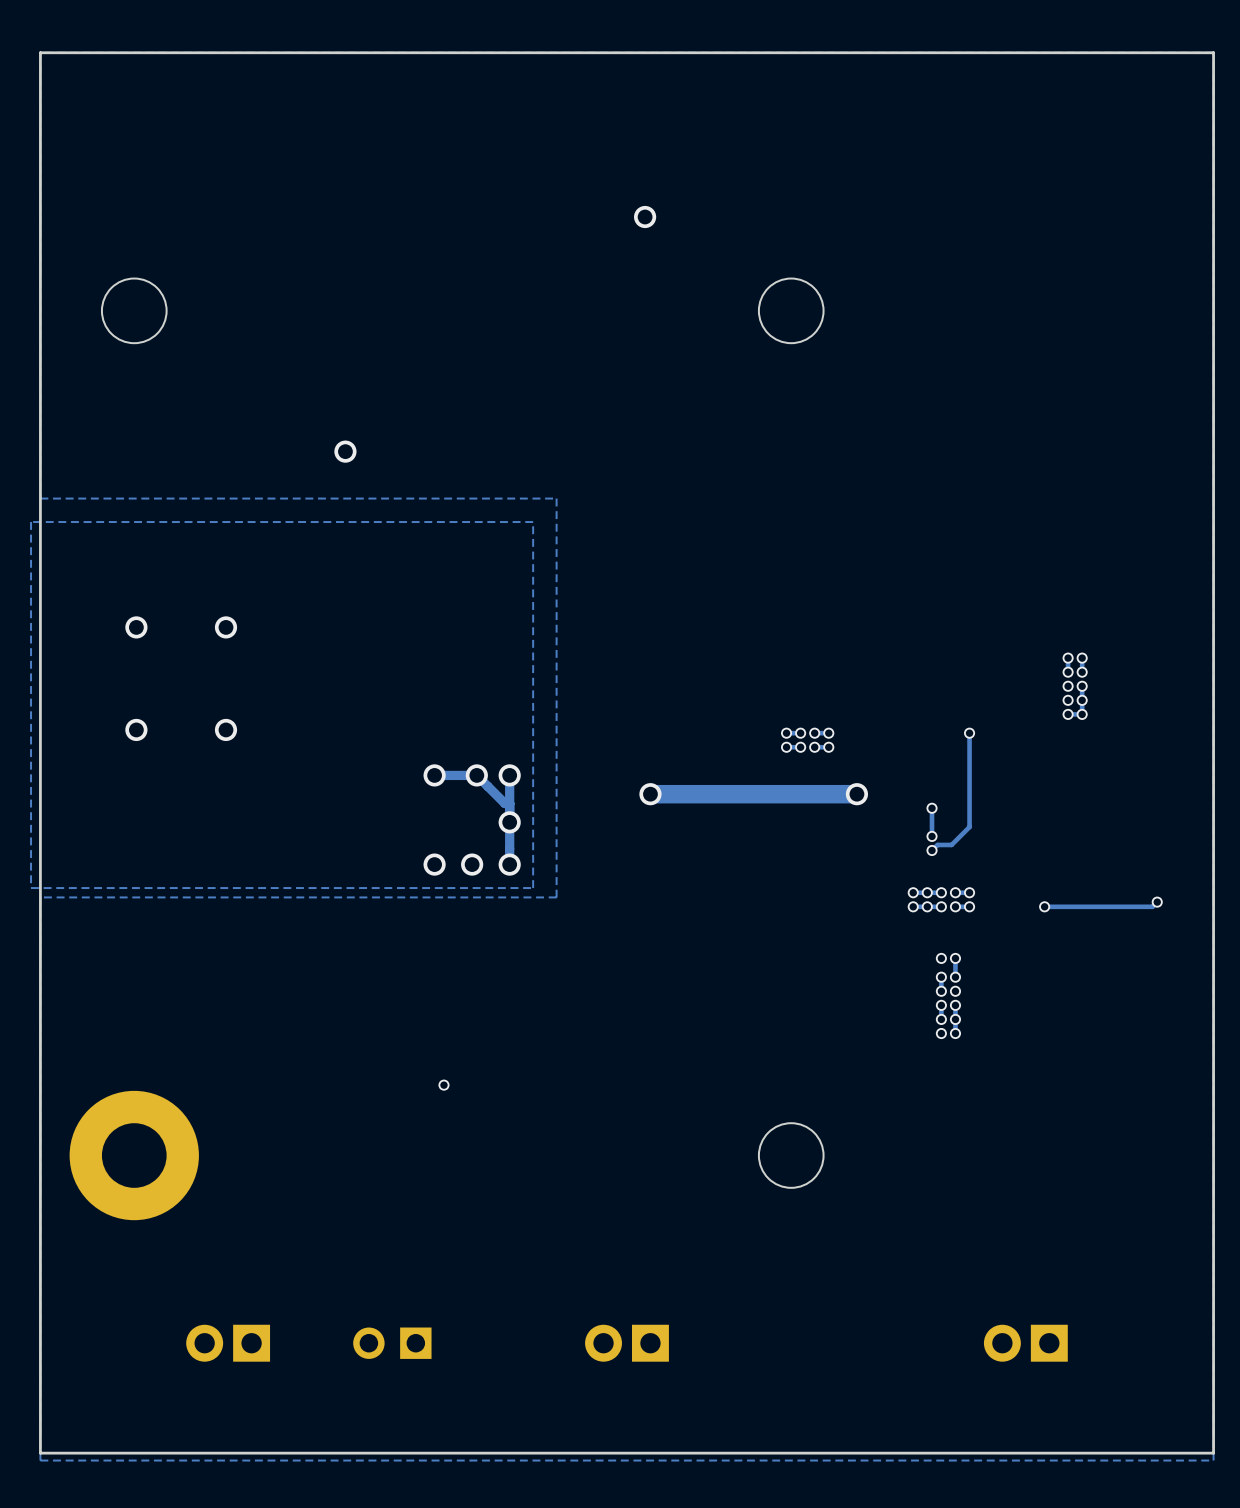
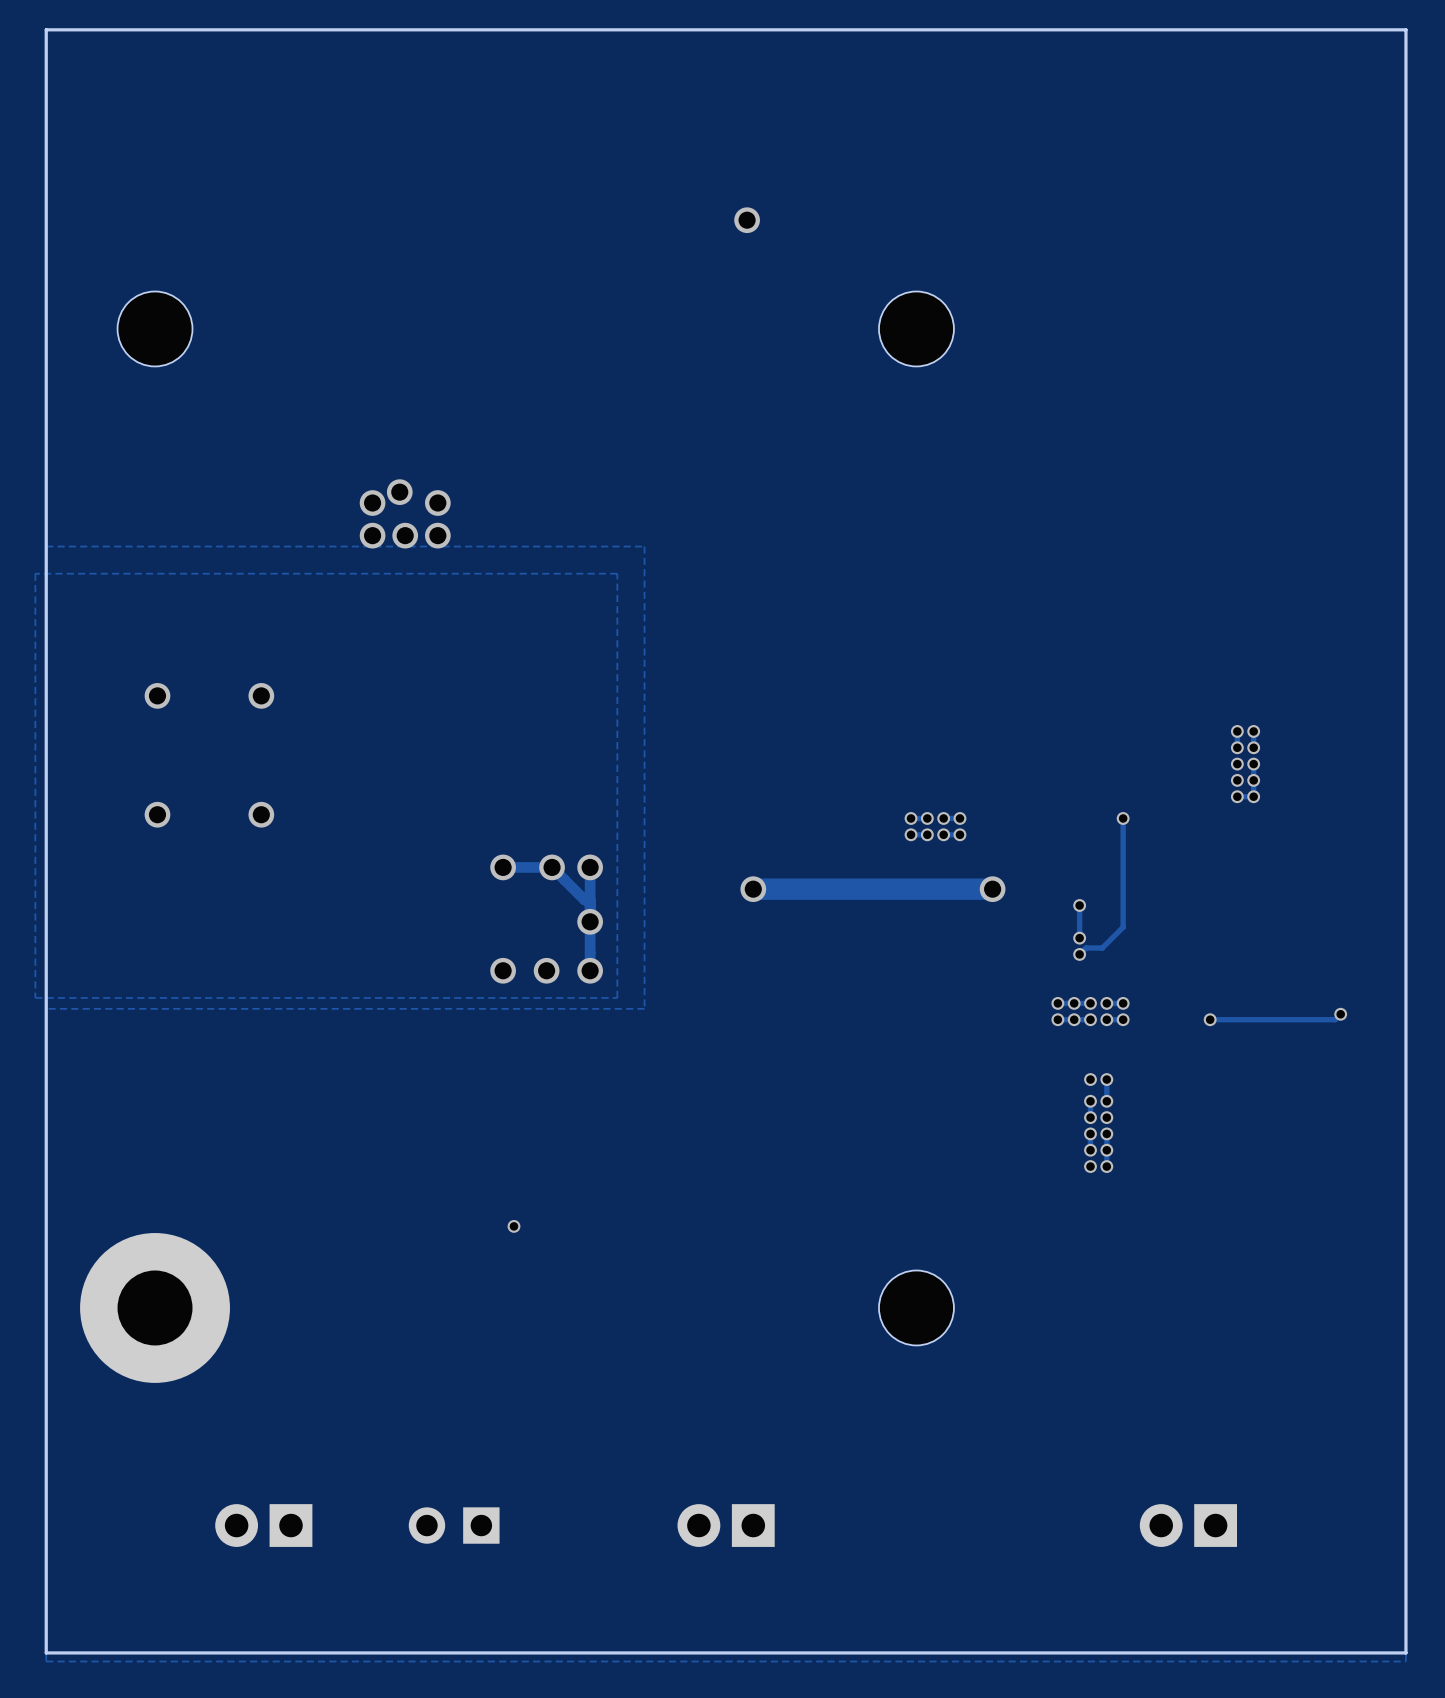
via: none -> (372, 503)
via: none -> (437, 503)
via: none -> (372, 535)
via: none -> (405, 535)
via: none -> (437, 535)

